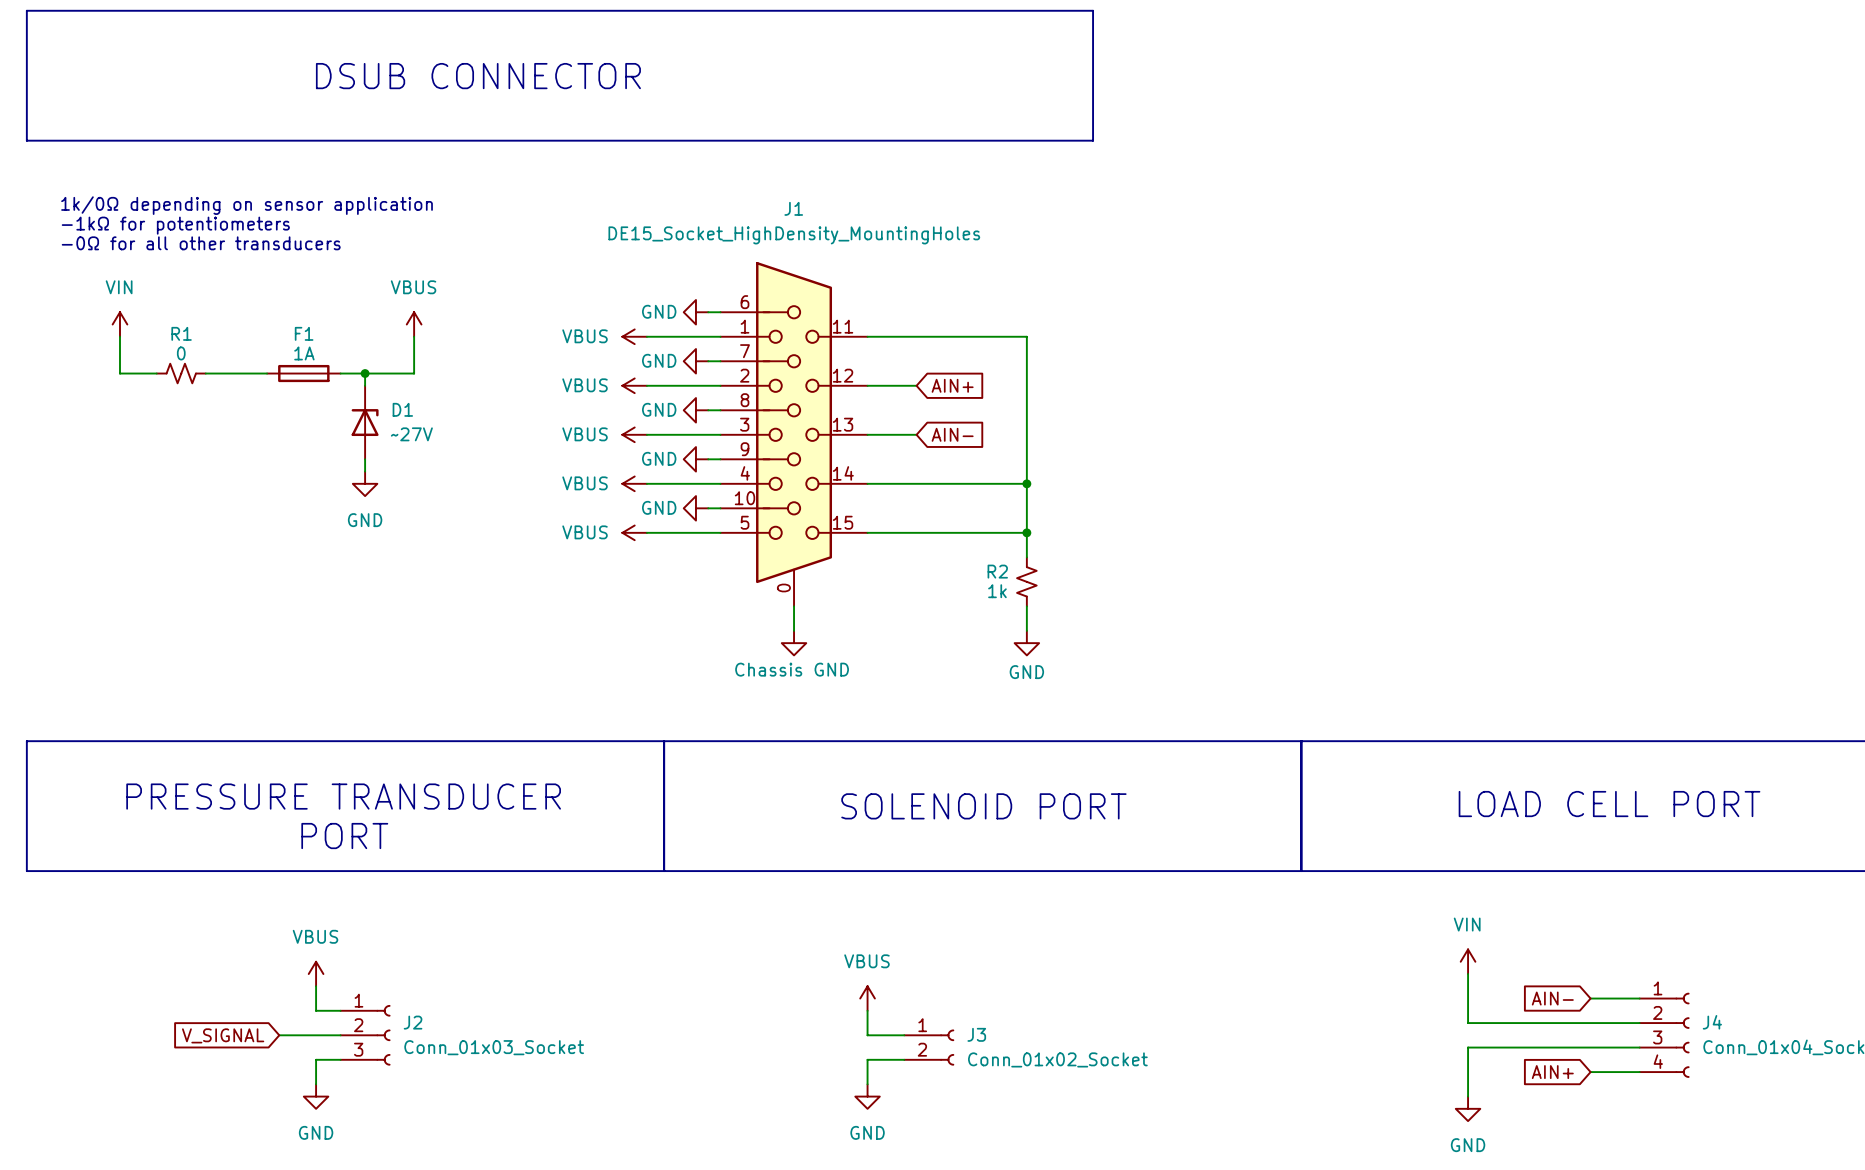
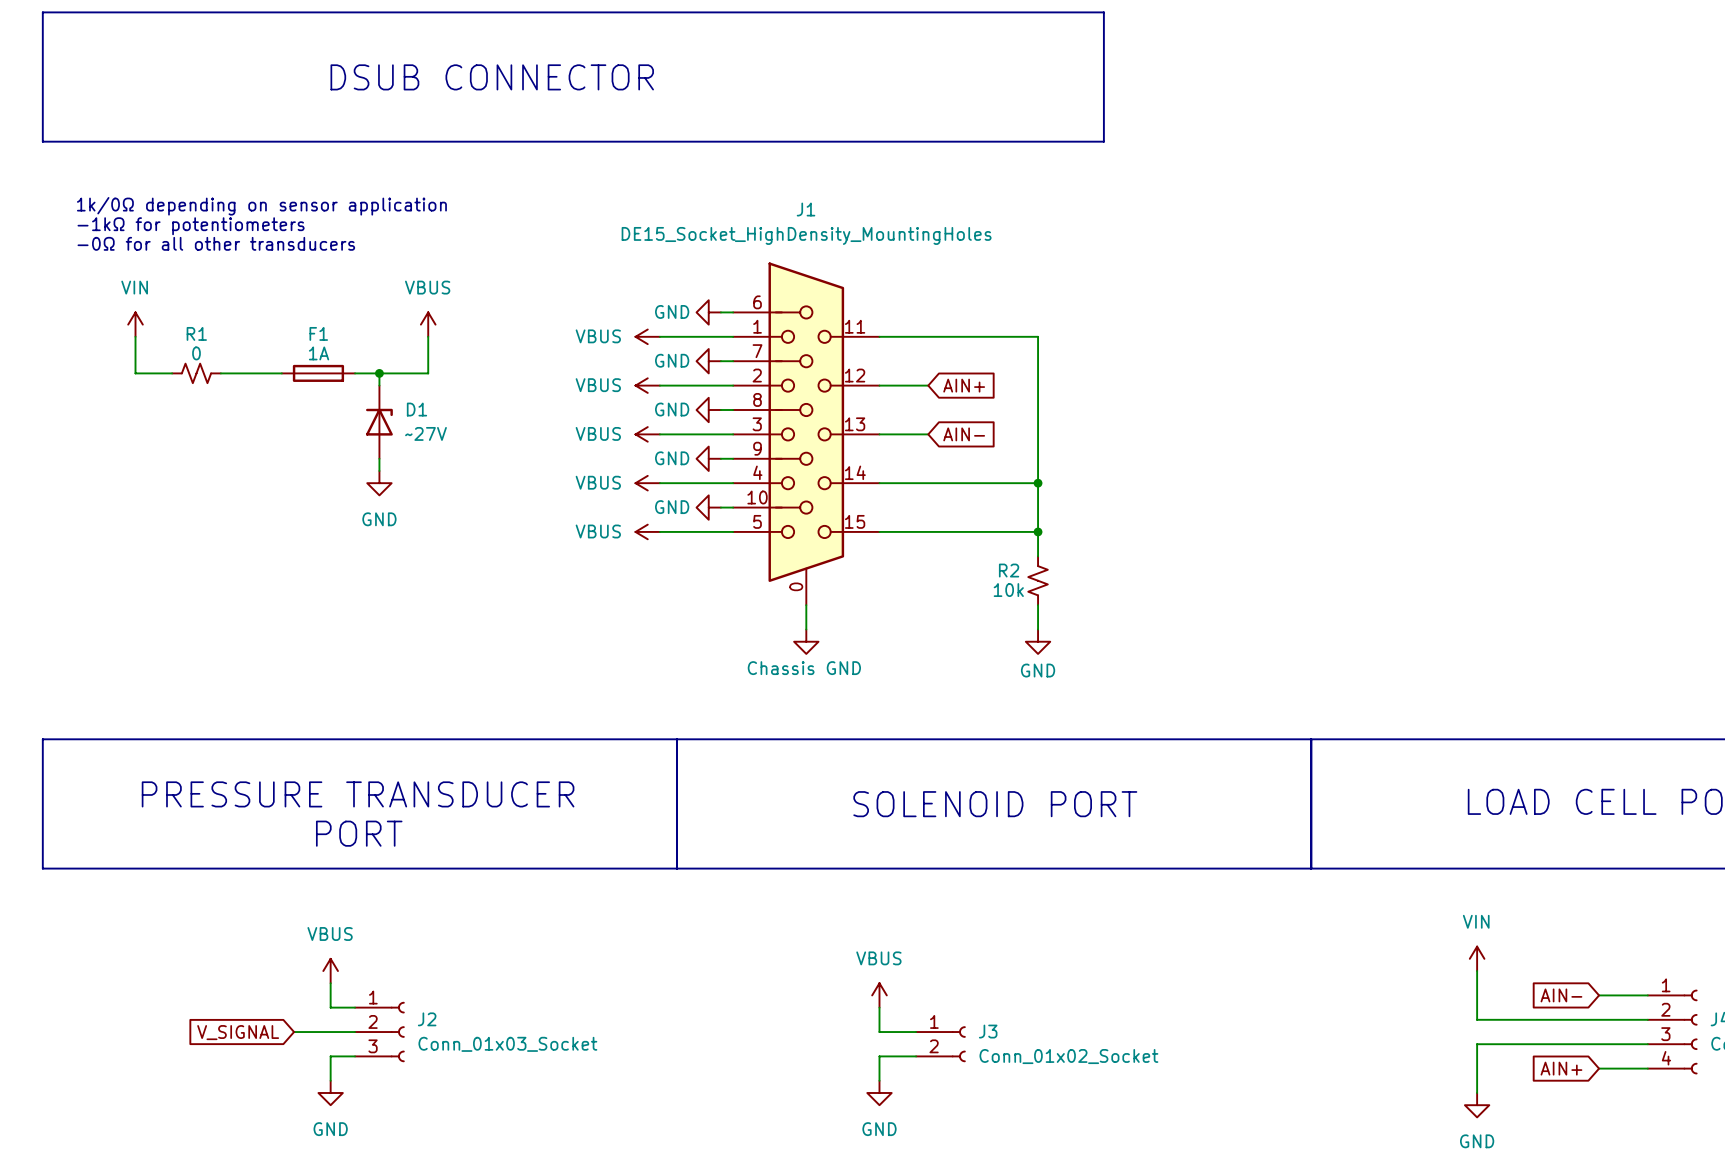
R2 value: 1k (997, 591) -> 10k (1008, 590)

